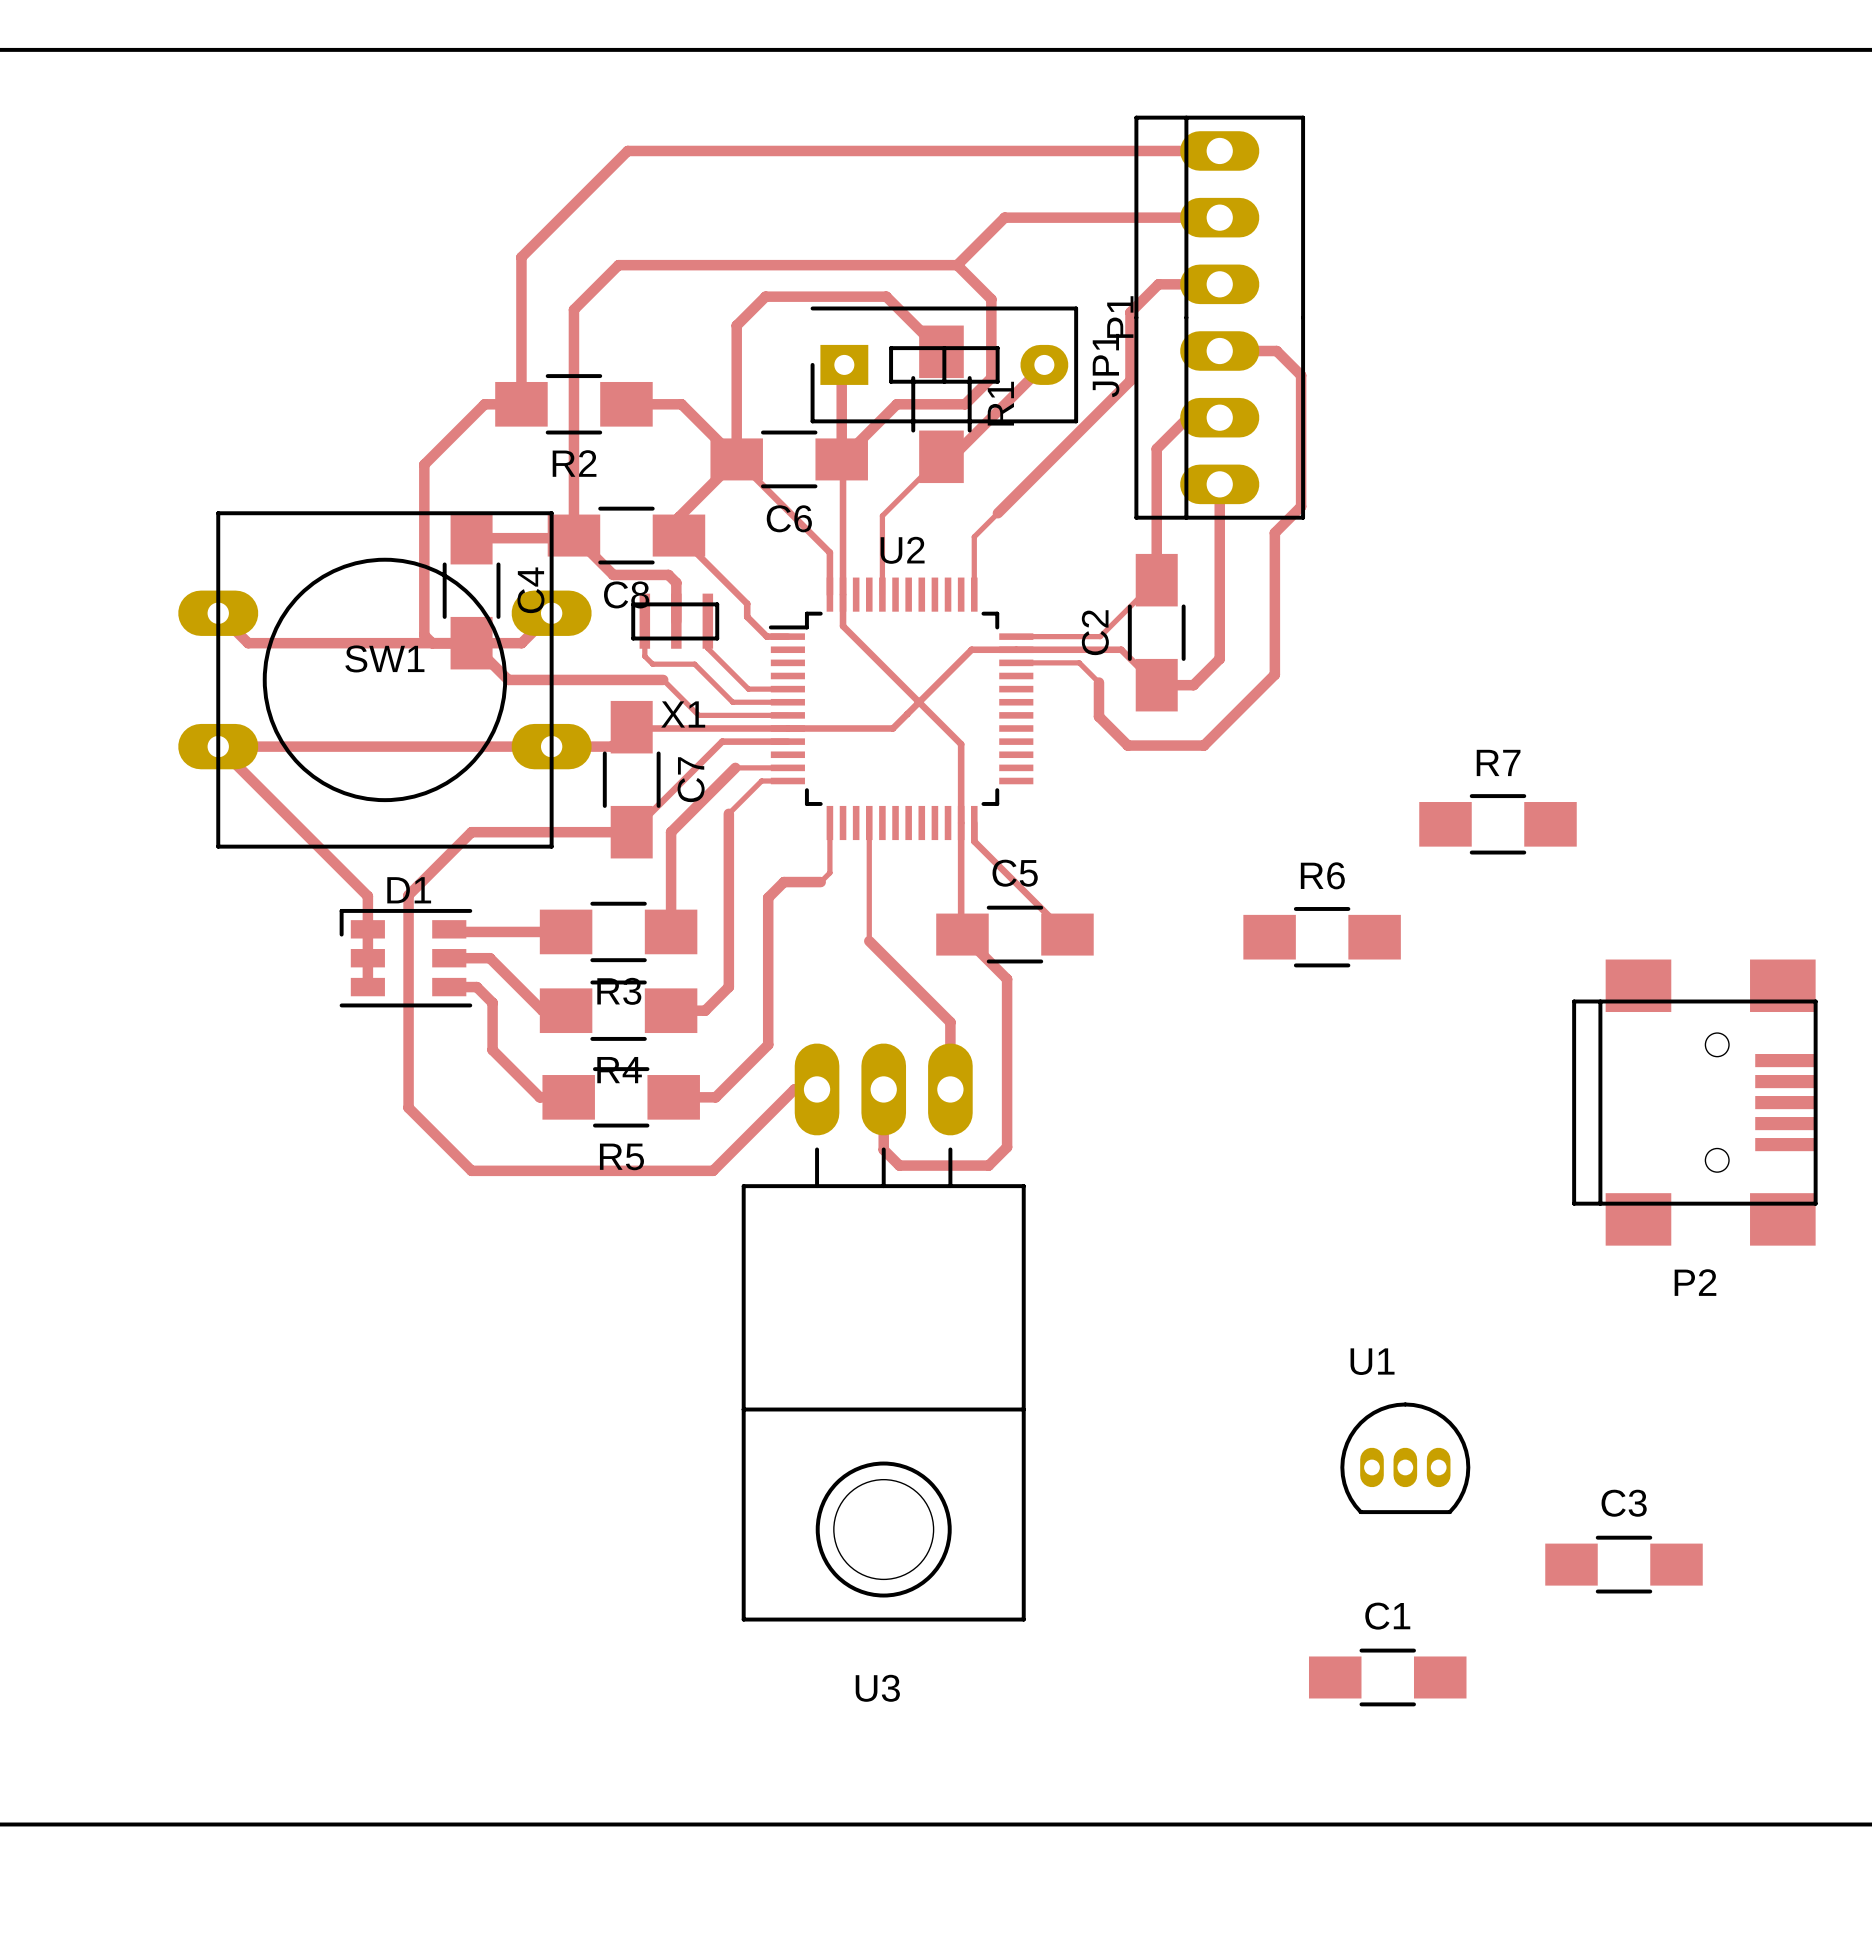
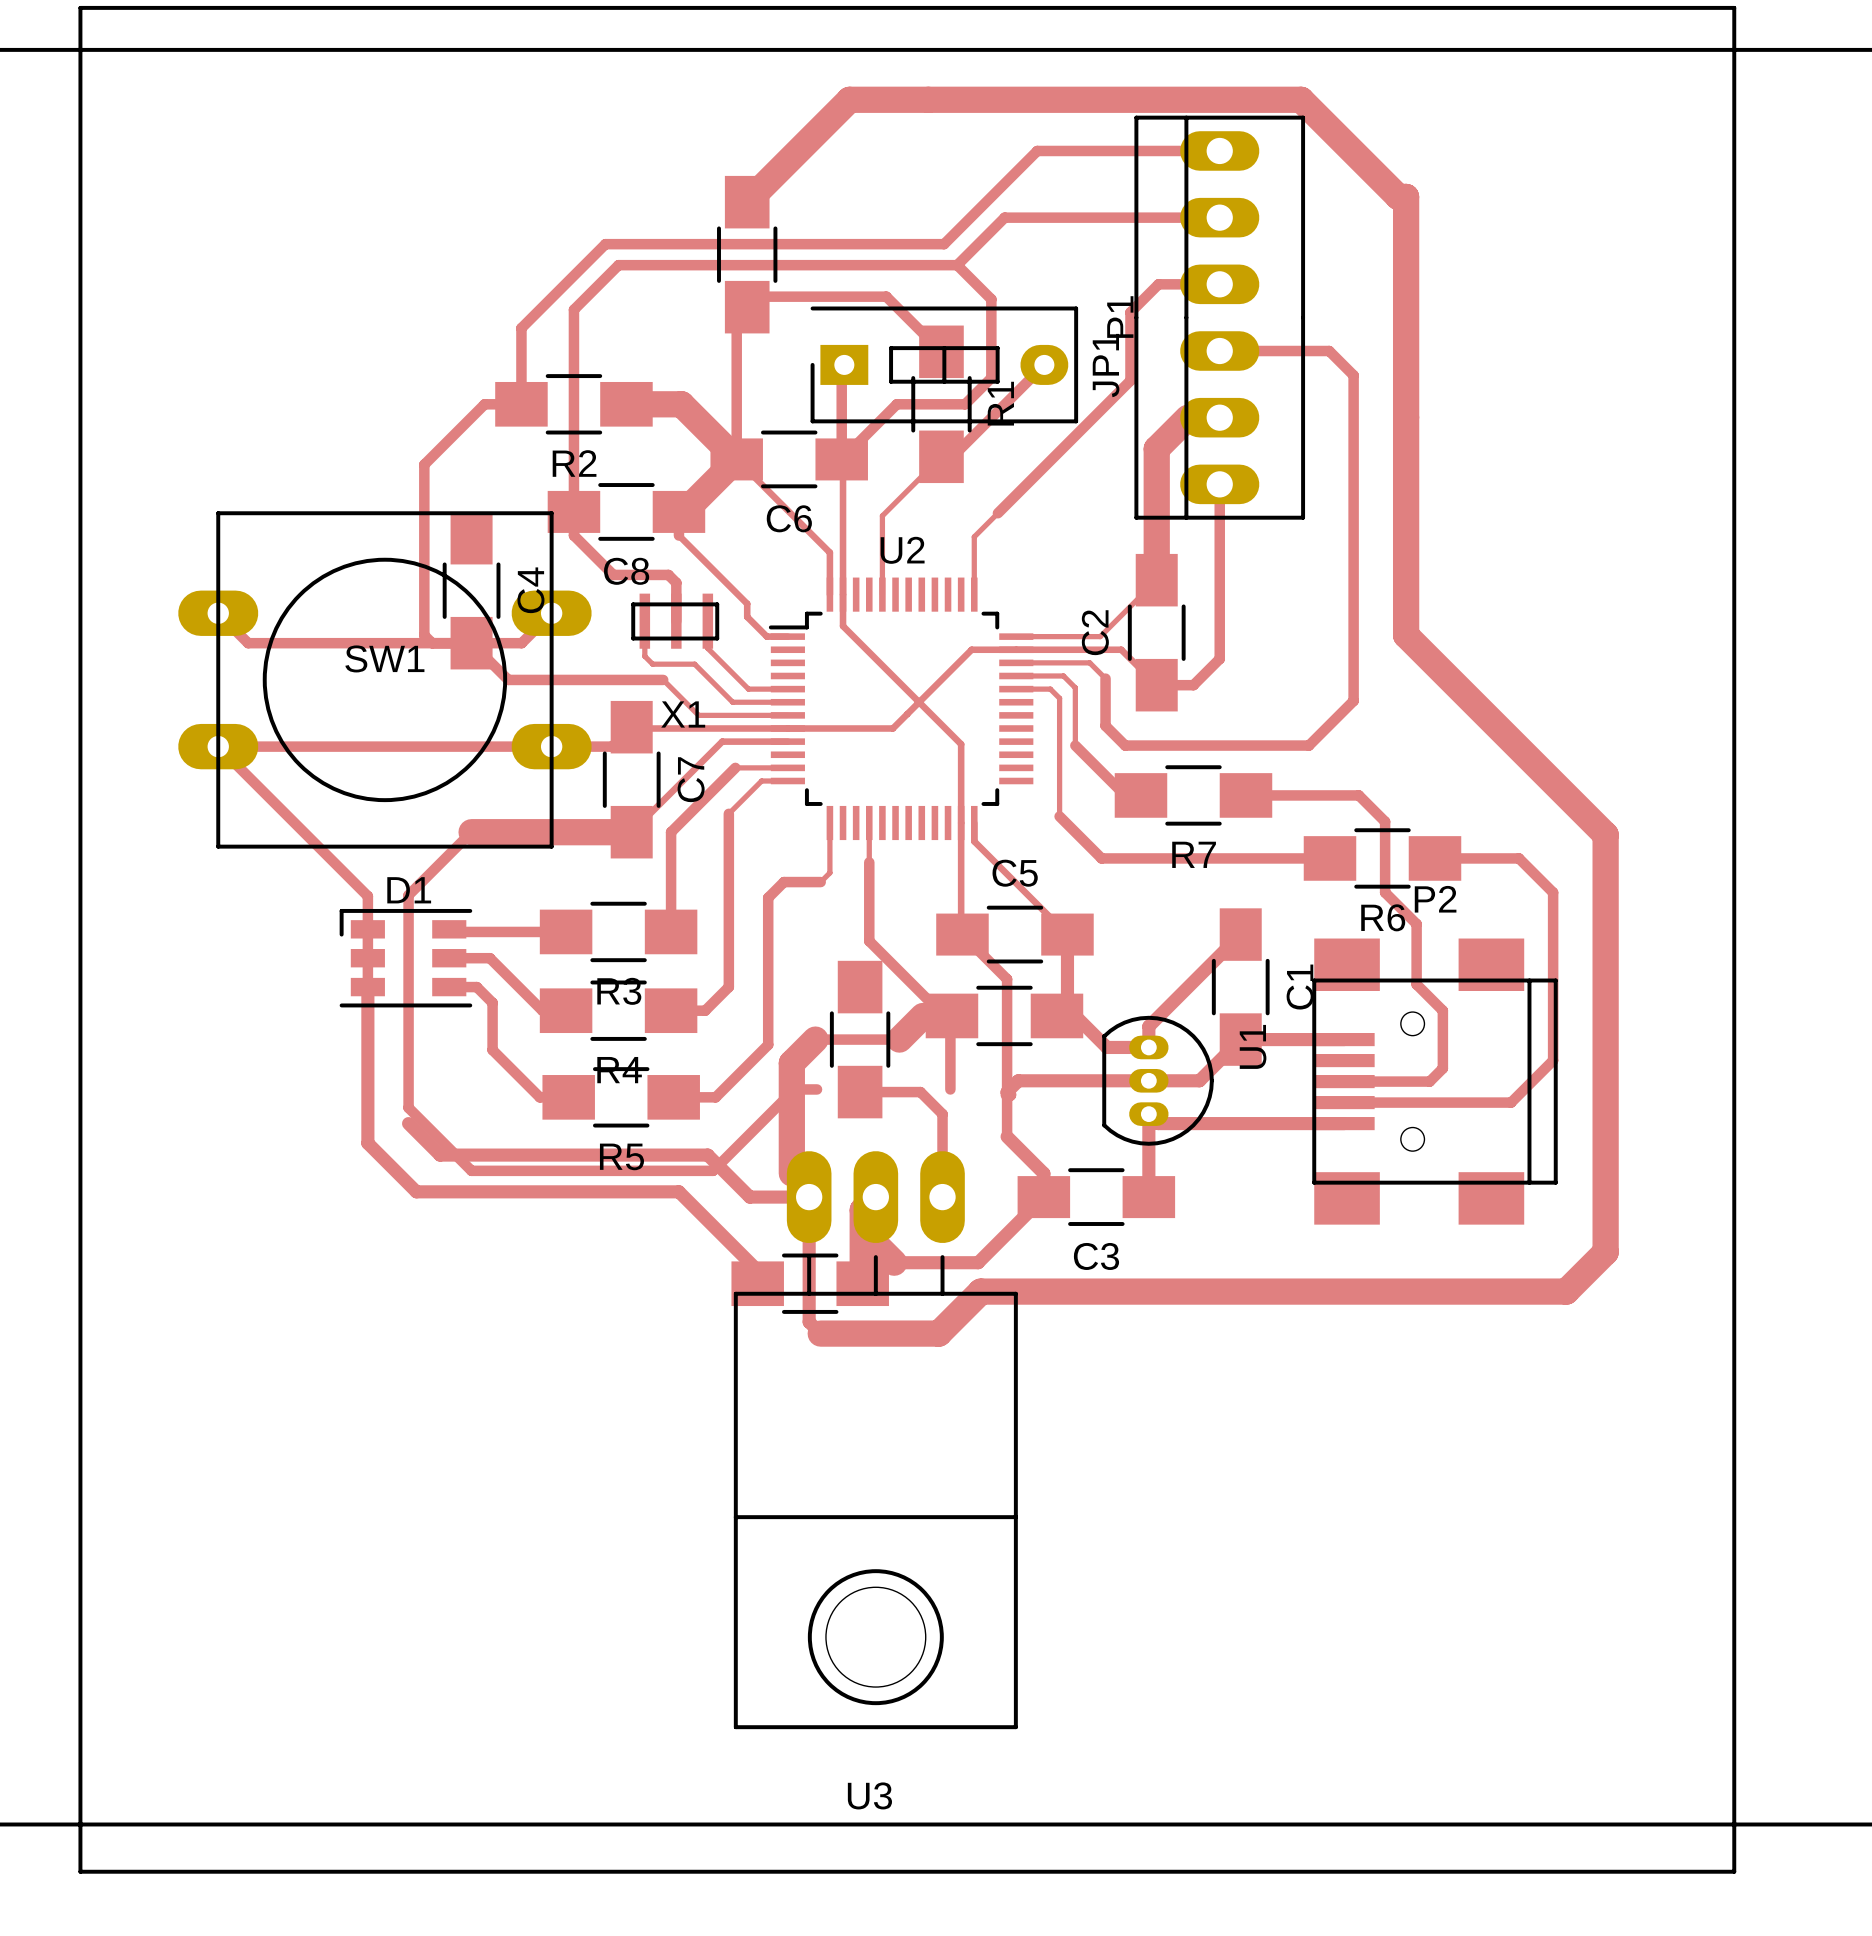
board edge: none -> (80, 7) (1734, 7) (1734, 1871) (80, 1871) (80, 7)
track: (1037, 150) (627, 150) (521, 257) (521, 328) -> (1037, 150) (944, 244) (605, 244) (521, 328)
track: none -> (747, 202) (849, 99) (1301, 99) (1398, 196) (1406, 196) (1406, 635) (1605, 834) (1605, 1252) (1566, 1291) (980, 1291) (938, 1333) (820, 1333) (809, 1322) (809, 1197) (749, 1197) (707, 1155) (440, 1155) (408, 1123)
part: none -> (747, 254)
track: (1276, 351) (1301, 375) (1301, 506) (1274, 532) (1274, 674) (1203, 745) -> (1276, 351) (1329, 351) (1353, 375) (1353, 700) (1308, 745) (1203, 745)
track width: thin (626, 404) (681, 404) (736, 459) (678, 517) -> thick (626, 404) (681, 404) (736, 459) (678, 517)
track width: thin (1187, 417) (1156, 448) (1156, 580) -> thick (1187, 417) (1156, 448) (1156, 580)
track: (573, 535) (571, 538) (471, 538) -> none
C8 position: (626, 535) -> (626, 511)
track: (1079, 662) (1098, 682) (1098, 716) (1127, 745) -> (1105, 678) (1105, 725) (1125, 745) (1127, 745)
track: none -> (1079, 662) (1089, 662) (1106, 679)
track: none -> (1016, 676) (1063, 676) (1075, 687) (1075, 745) (1125, 795) (1140, 795)
track: none -> (1016, 689) (1050, 689) (1059, 698) (1059, 816) (1101, 858) (1329, 858)
R7 name position: R7 (1498, 762) -> R7 (1194, 854)
track: none -> (1245, 795) (1358, 795) (1385, 821) (1385, 892) (1416, 924) (1416, 984) (1442, 1010) (1442, 1068) (1429, 1081) (1344, 1081)
R7 position: (1498, 824) -> (1193, 795)
track width: thin (471, 832) (631, 832) -> thick (471, 832) (631, 832)
track: none -> (1434, 858) (1519, 858) (1553, 892) (1553, 1060) (1511, 1102) (1344, 1102)
track width: thin (869, 862) (869, 941) -> thick (869, 862) (869, 941)
R6 name position: R6 (1322, 875) -> R6 (1383, 917)
track: none -> (1067, 934) (1067, 1008) (1106, 1047) (1148, 1047) (1148, 1026) (1240, 934)
R6 position: (1322, 937) -> (1382, 858)
track: none -> (367, 987) (367, 1143) (416, 1191) (678, 1191) (757, 1270) (757, 1283)
track: none -> (951, 1015) (923, 1015) (899, 1039) (815, 1039) (791, 1063) (791, 1173)
part: none -> (1004, 1015)
part: none -> (860, 1039)
track: none -> (1344, 1039) (1240, 1039) (1199, 1080) (1018, 1080) (1007, 1092) (1009, 1094) (1007, 1094)
track: (883, 1089) (883, 1149) (899, 1165) (988, 1165) (1007, 1147) (1007, 1136) -> (862, 1283) (862, 1210) (875, 1197) (875, 1244) (894, 1262) (978, 1262) (1043, 1197) (1043, 1173) (1007, 1136)
track: none -> (860, 1092) (920, 1092) (942, 1114) (942, 1197)
P2 rotation: 0° (1694, 1102) -> 180° (1434, 1081)
P2 position: (1694, 1102) -> (1434, 1081)
track: none -> (1344, 1123) (1158, 1123) (1148, 1114) (1148, 1197)
part: none -> (810, 1283)
U3 position: (883, 1332) -> (875, 1440)
U1 rotation: 0° (1405, 1458) -> 90° clockwise (1158, 1080)
U1 position: (1405, 1458) -> (1158, 1080)
C3 name position: C3 (1624, 1503) -> C3 (1096, 1256)
C3 position: (1624, 1564) -> (1096, 1197)
C1 rotation: 0° (1387, 1677) -> 90° clockwise (1240, 987)
C1 position: (1387, 1677) -> (1240, 987)

